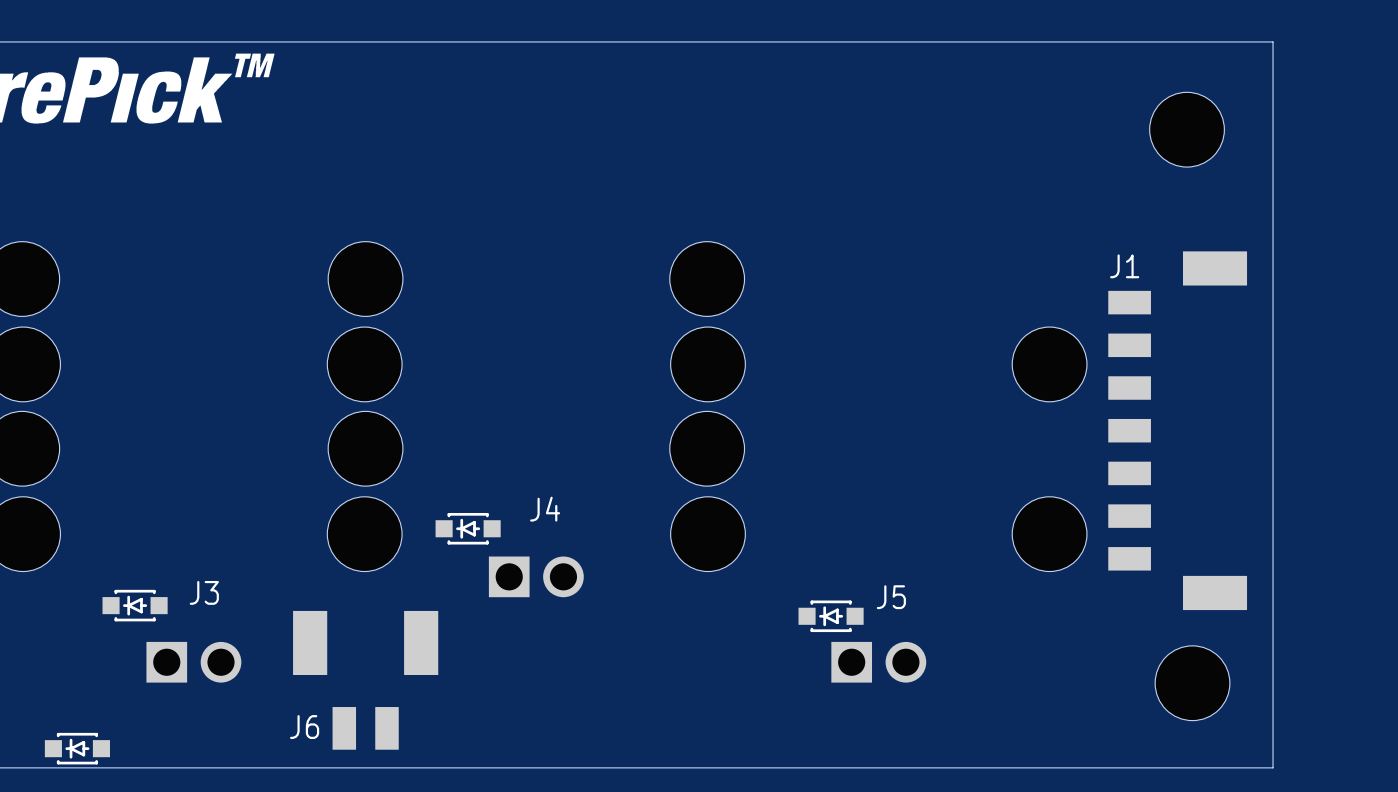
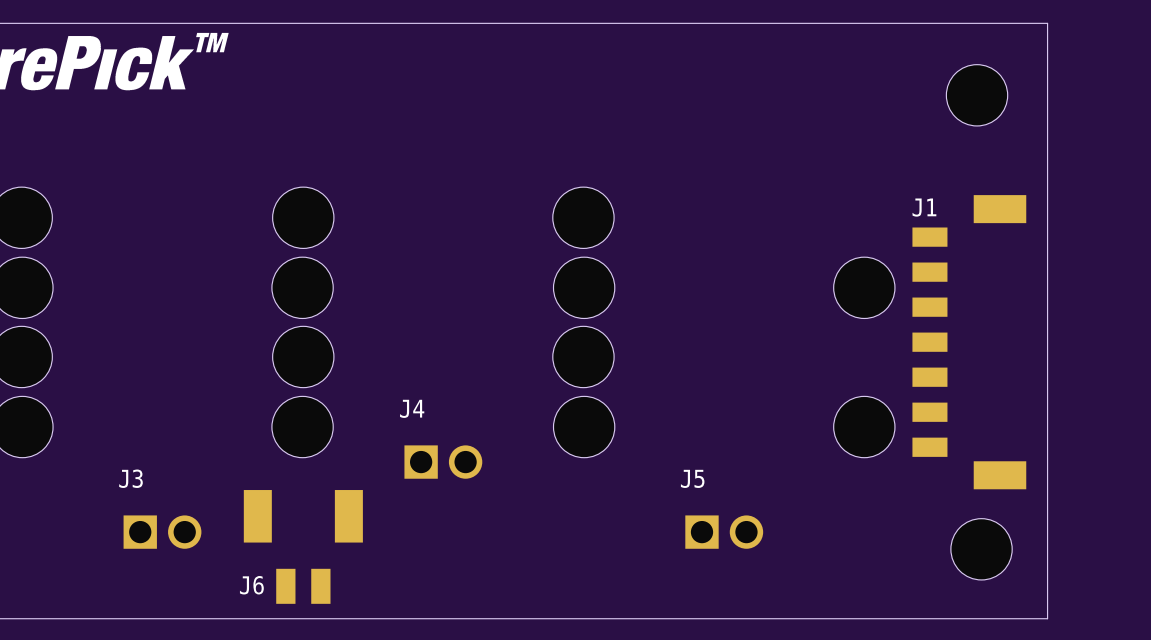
J4 name position: J4 (545, 509) -> J4 (412, 408)
part: (468, 528) -> none
J3 name position: J3 (204, 592) -> J3 (130, 478)
J5 name position: J5 (891, 597) -> J5 (692, 478)
part: (135, 605) -> none
part: (831, 616) -> none
part: (77, 748) -> none

